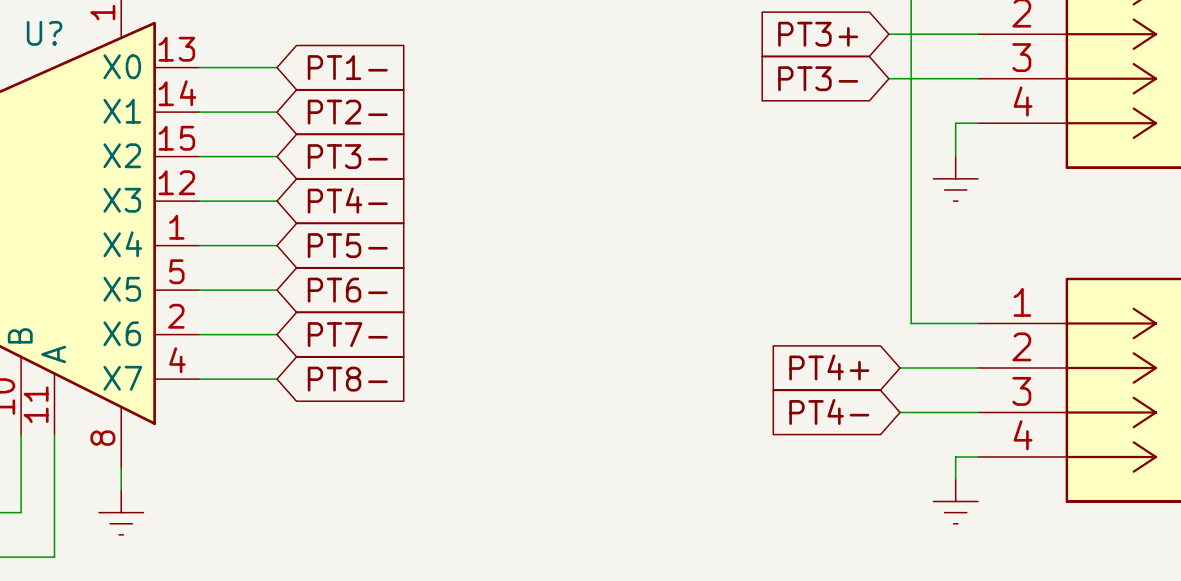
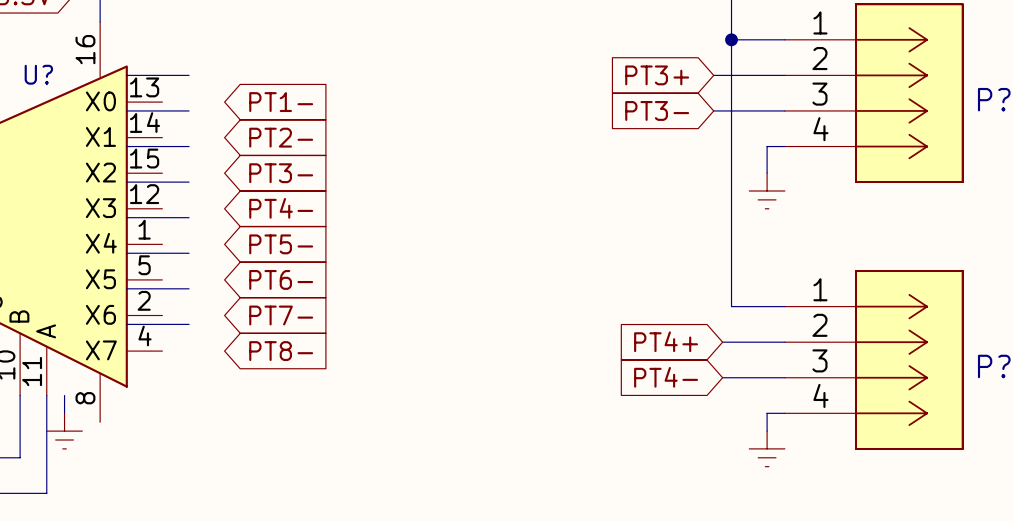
wire: (199, 67) (276, 67) -> (126, 75) (189, 75)
wire: (199, 112) (276, 112) -> (126, 110) (189, 110)
wire: (199, 156) (276, 156) -> (126, 146) (189, 146)
wire: (199, 201) (276, 201) -> (126, 182) (189, 182)
wire: (199, 245) (276, 245) -> (126, 217) (189, 217)
wire: (199, 290) (276, 290) -> (126, 253) (189, 253)
wire: (199, 334) (276, 334) -> (126, 288) (189, 288)
wire: (199, 379) (276, 379) -> (126, 324) (189, 324)
wire: (121, 468) (121, 490) -> (64, 395) (64, 413)
power symbol position: (121, 512) -> (64, 431)

